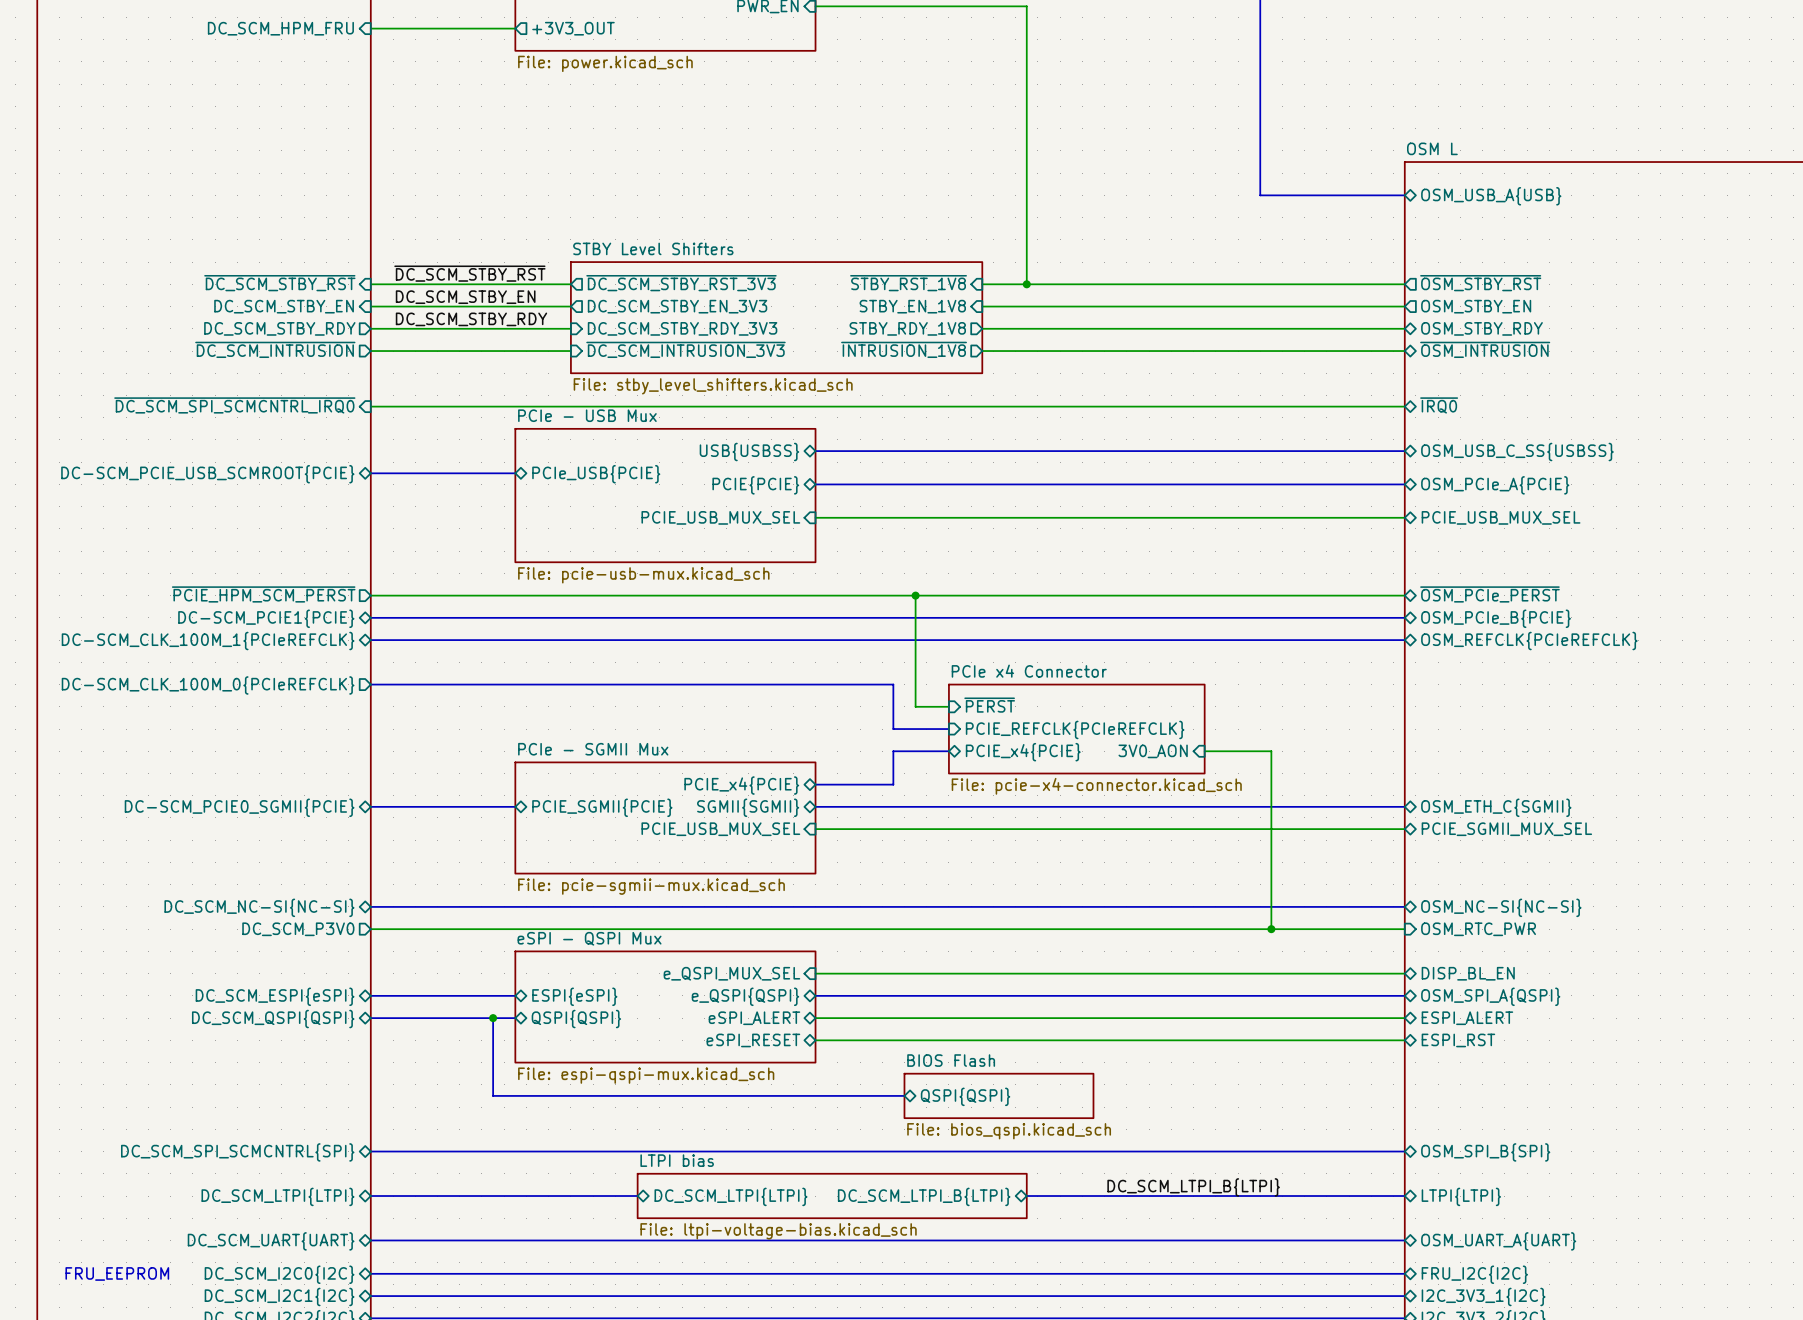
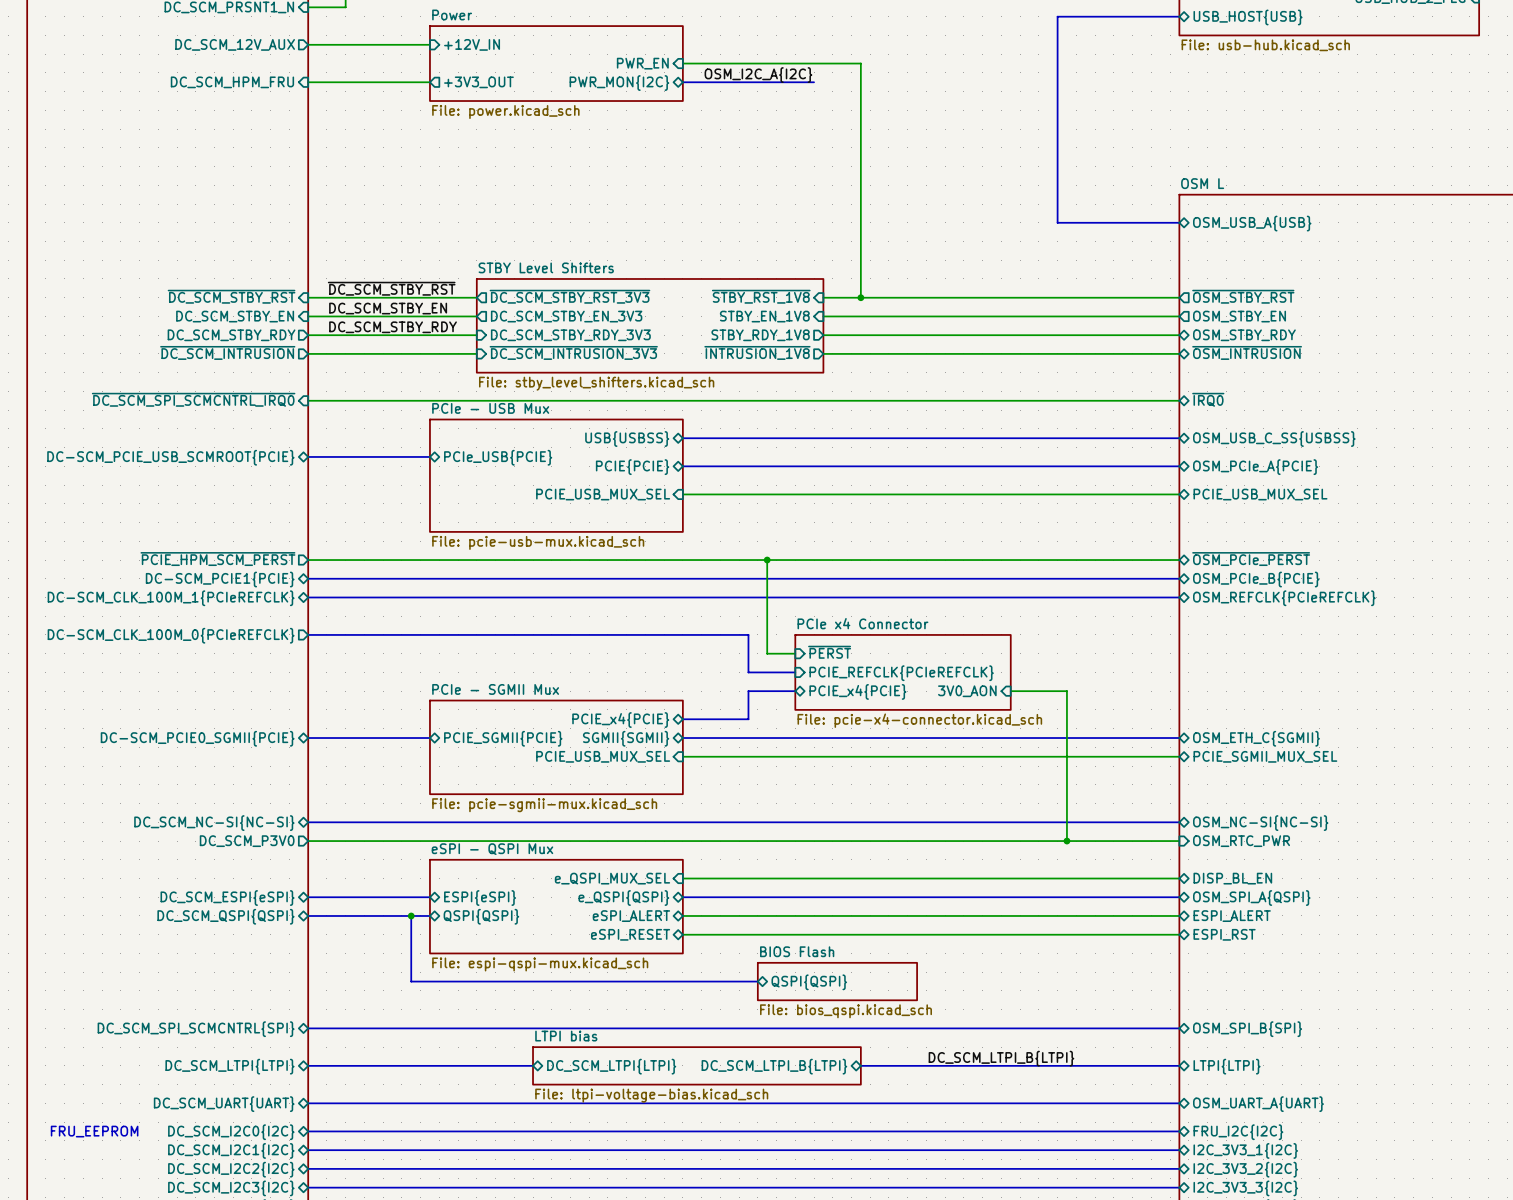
label: none -> OSM_I2C_A{I2C} (758, 75)
bus: none -> (682, 82) (814, 82)
sheet pin: none -> PWR_MON{I2C} (619, 83)

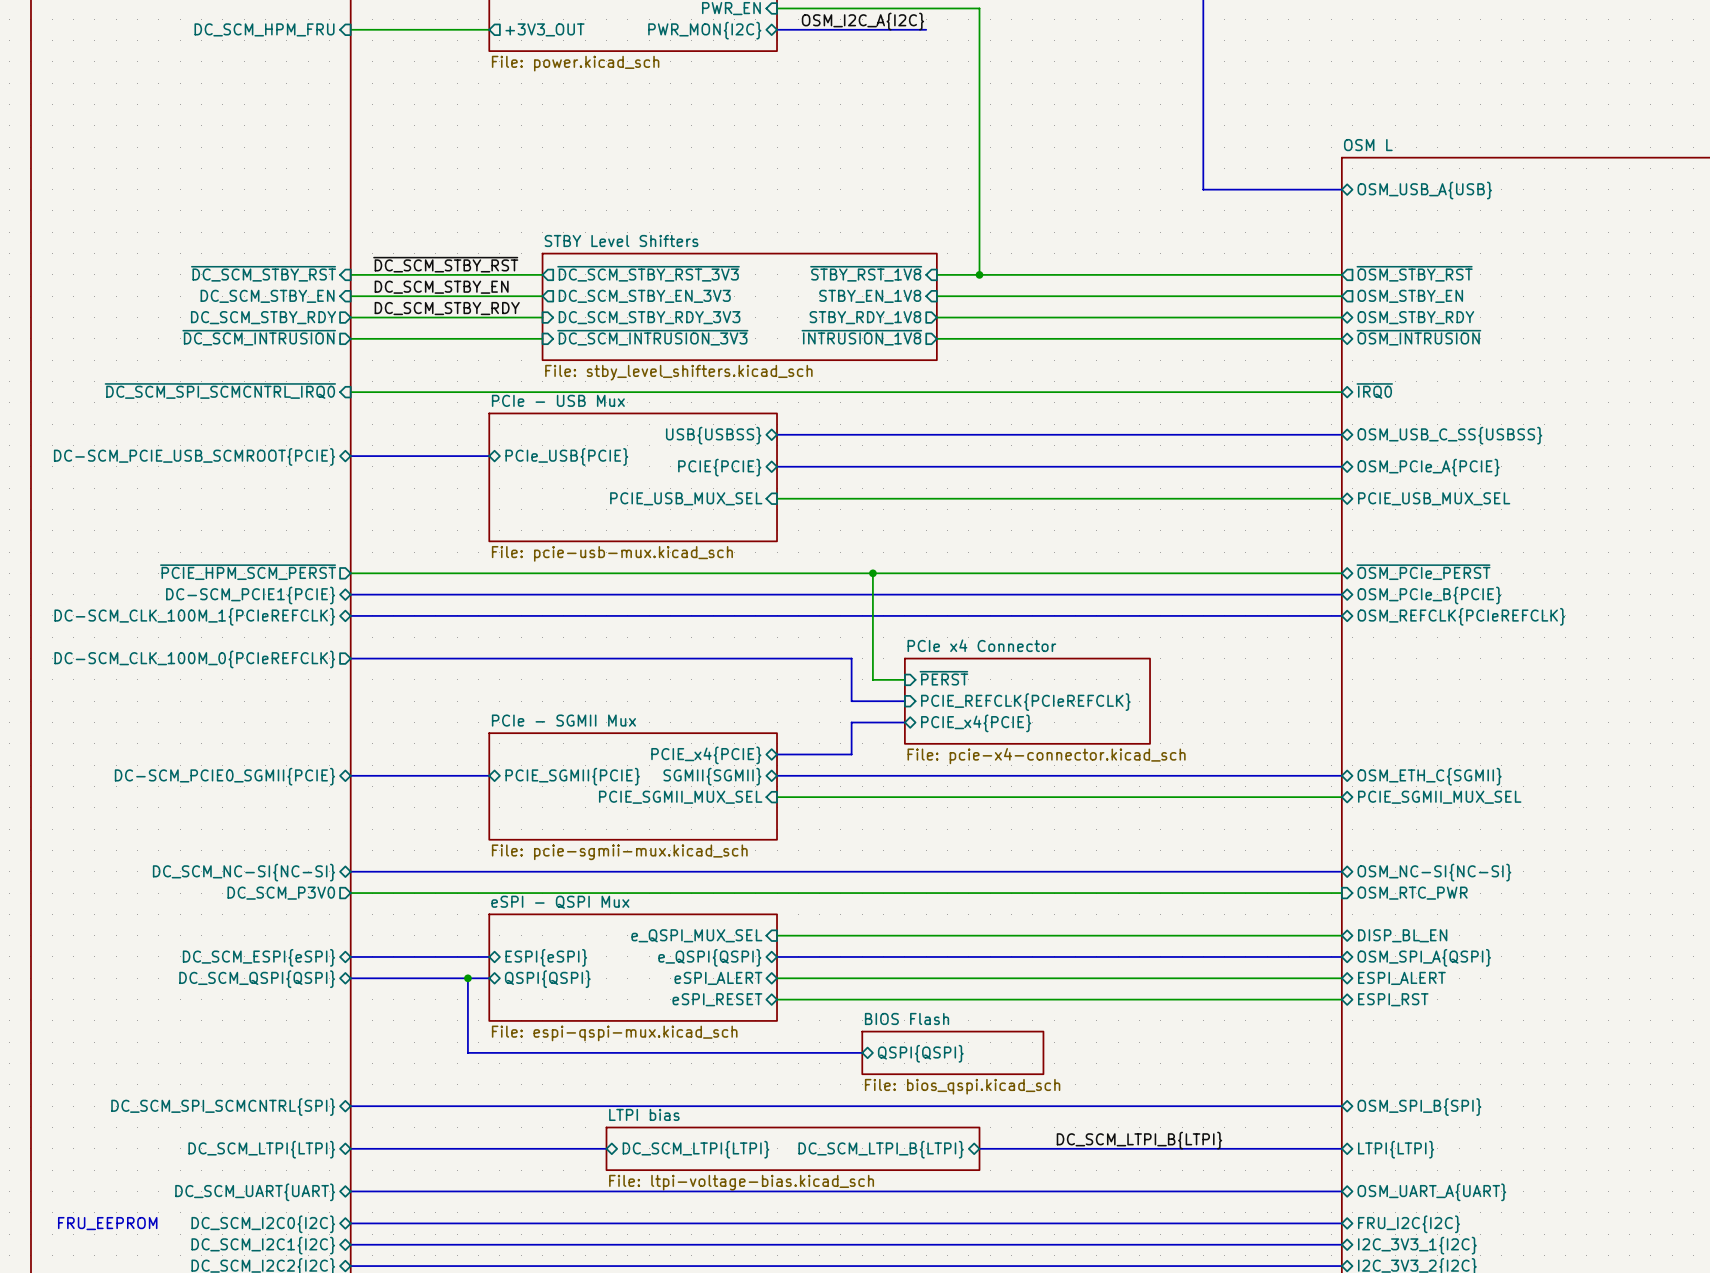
sheet pin: 3V0_AON (967, 691) -> none
wire: (1010, 691) (1066, 691) (1066, 841) -> none
sheet pin: PCIE_USB_MUX_SEL (603, 756) -> PCIE_SGMII_MUX_SEL (680, 797)
junction: (1066, 841) -> none

